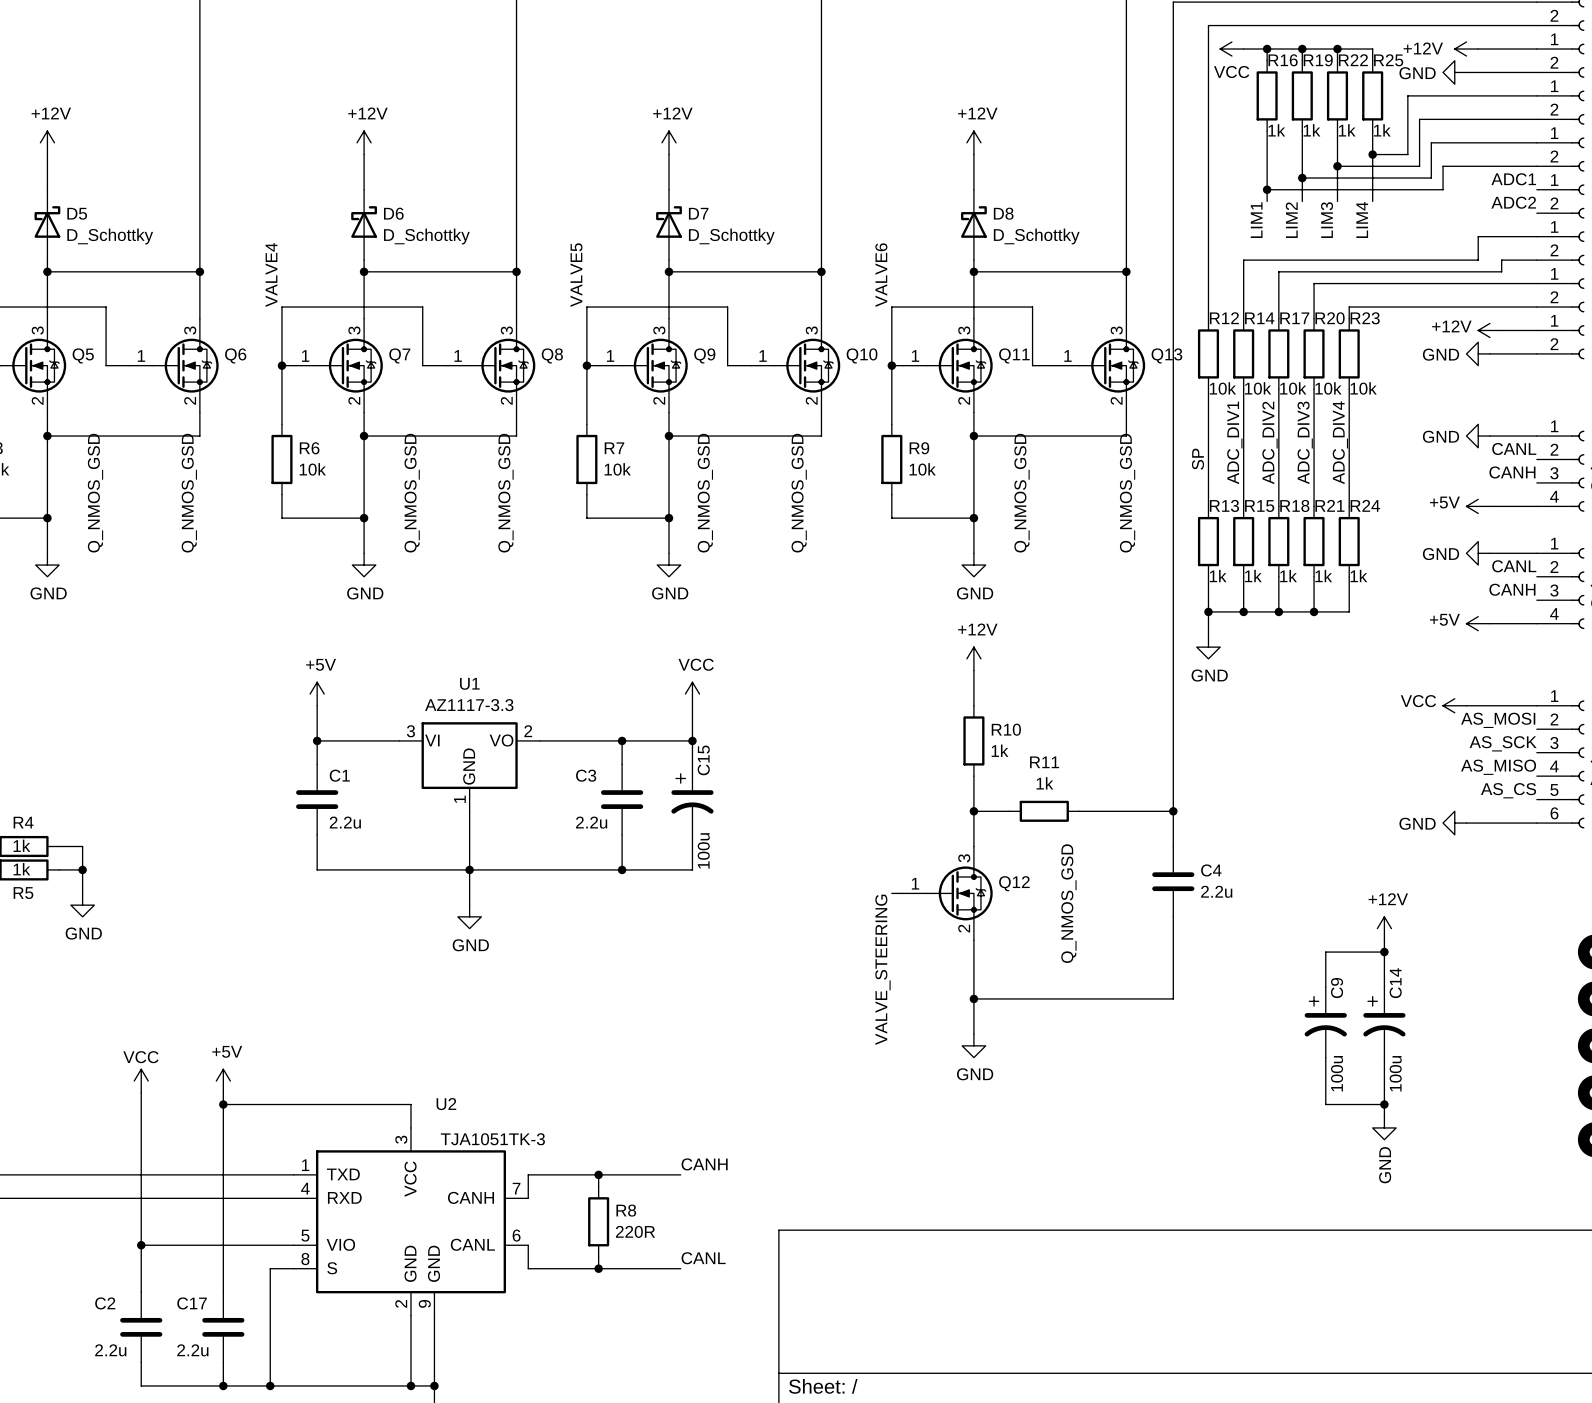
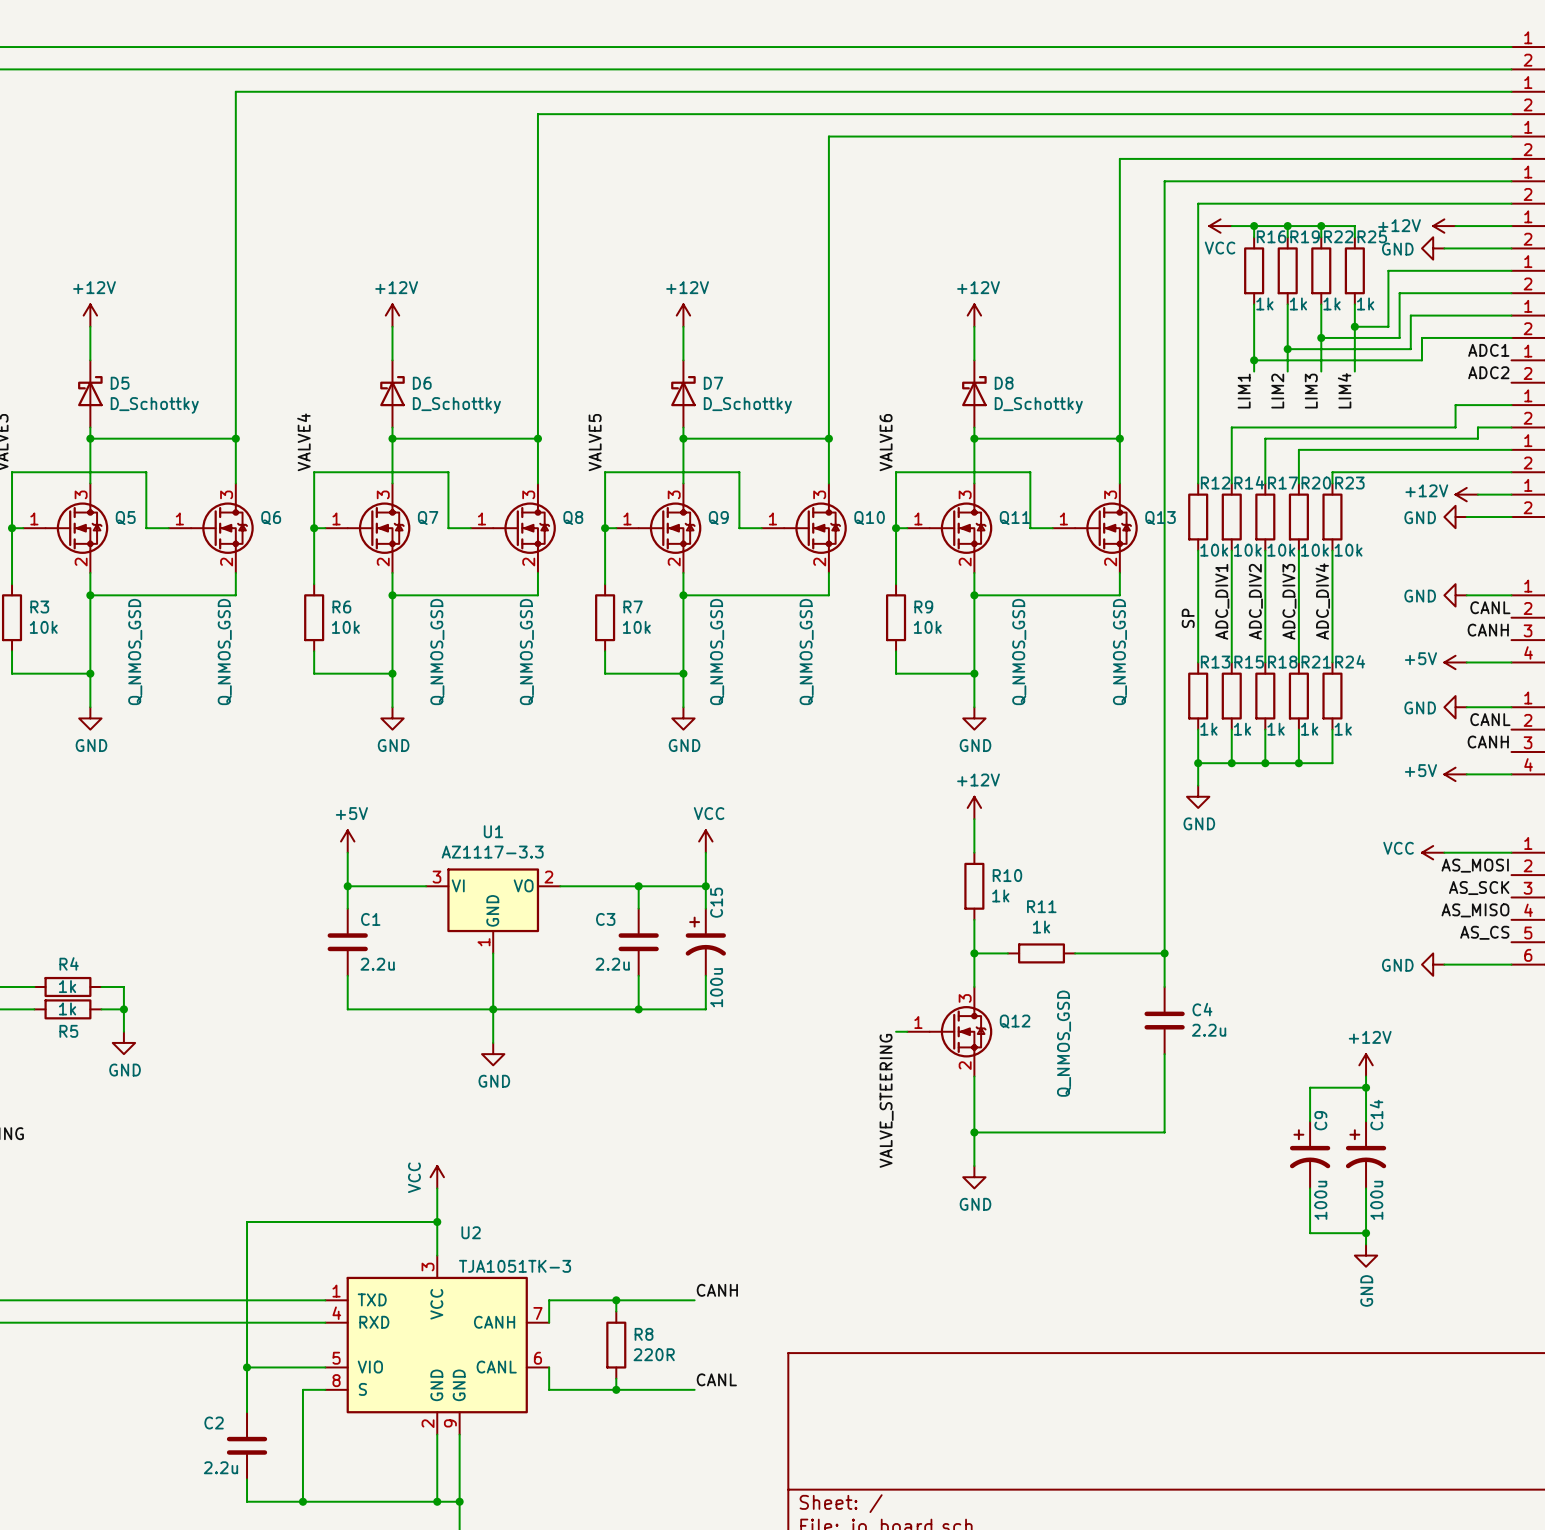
power symbol: none -> VCC (437, 1177)
power symbol: VCC (141, 1081) -> none
power symbol: +5V (223, 1081) -> none
wire: (141, 1092) (141, 1292) -> none
wire: (223, 1092) (223, 1292) -> none
wire: none -> (437, 1221) (247, 1221) (247, 1412)
junction: none -> (437, 1221)
wire: (223, 1104) (410, 1104) -> (437, 1188) (437, 1233)
junction: (223, 1104) -> none
wire: (141, 1245) (211, 1245) -> none
junction: (141, 1245) -> none
junction: none -> (247, 1367)
C2 position: (141, 1327) -> (247, 1445)
C17: 2.2u (223, 1327) -> none
wire: (141, 1362) (141, 1385) (211, 1385) -> (247, 1479) (247, 1501)
wire: (223, 1362) (223, 1385) -> none
junction: (223, 1385) -> none

